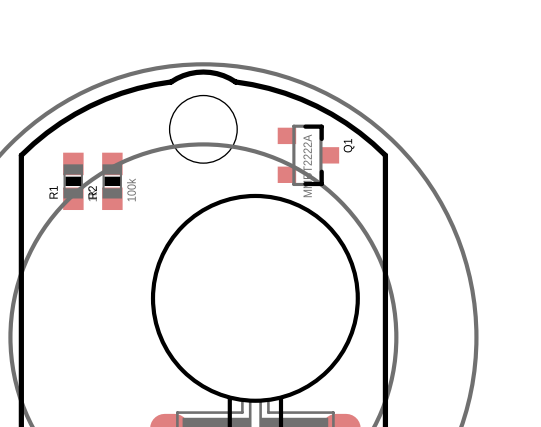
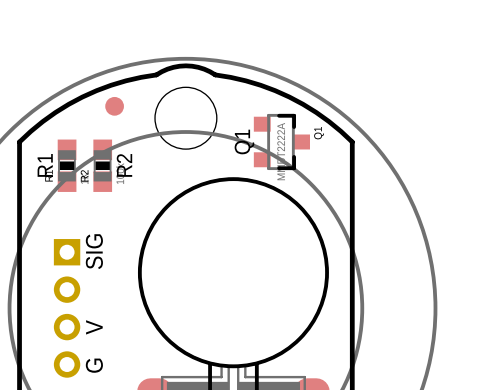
part: none -> (114, 106)
text: none -> Q1 (244, 142)
text: none -> R1 (45, 165)
text: none -> R2 (124, 165)
text: none -> SIG (94, 251)
part: none -> (67, 308)
text: none -> V (94, 327)
text: none -> G (94, 365)

